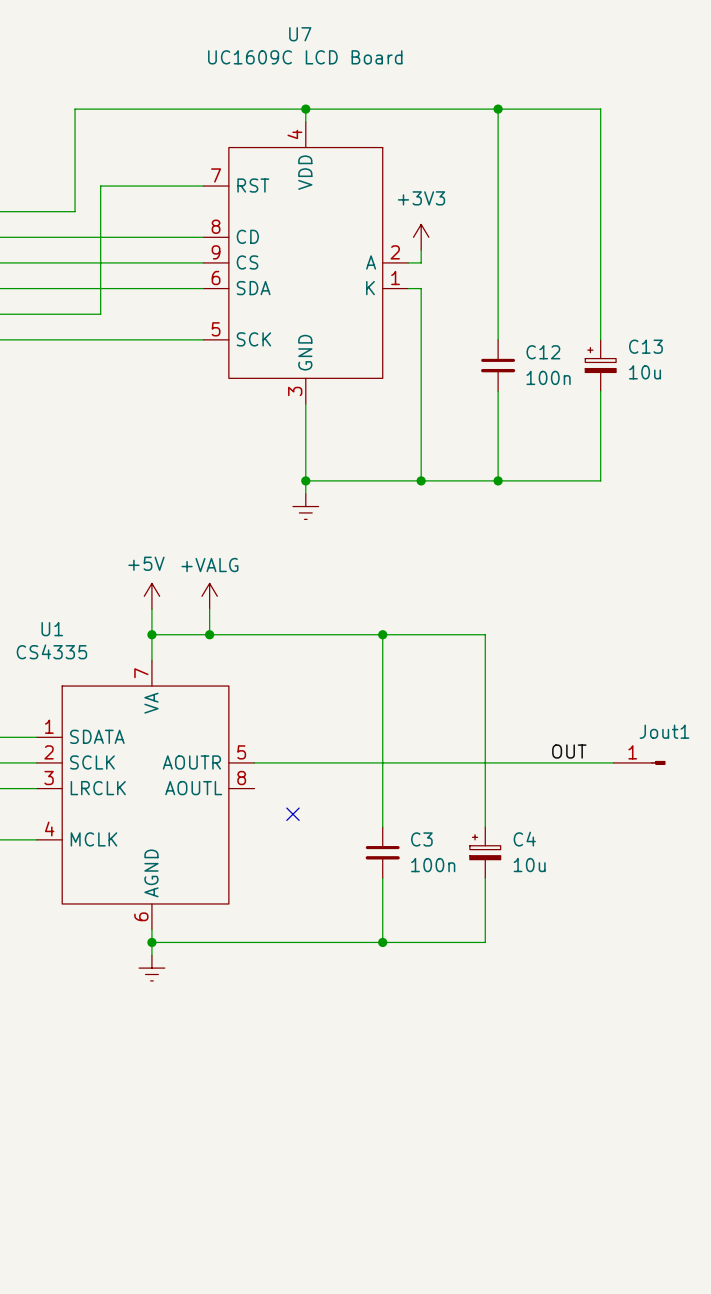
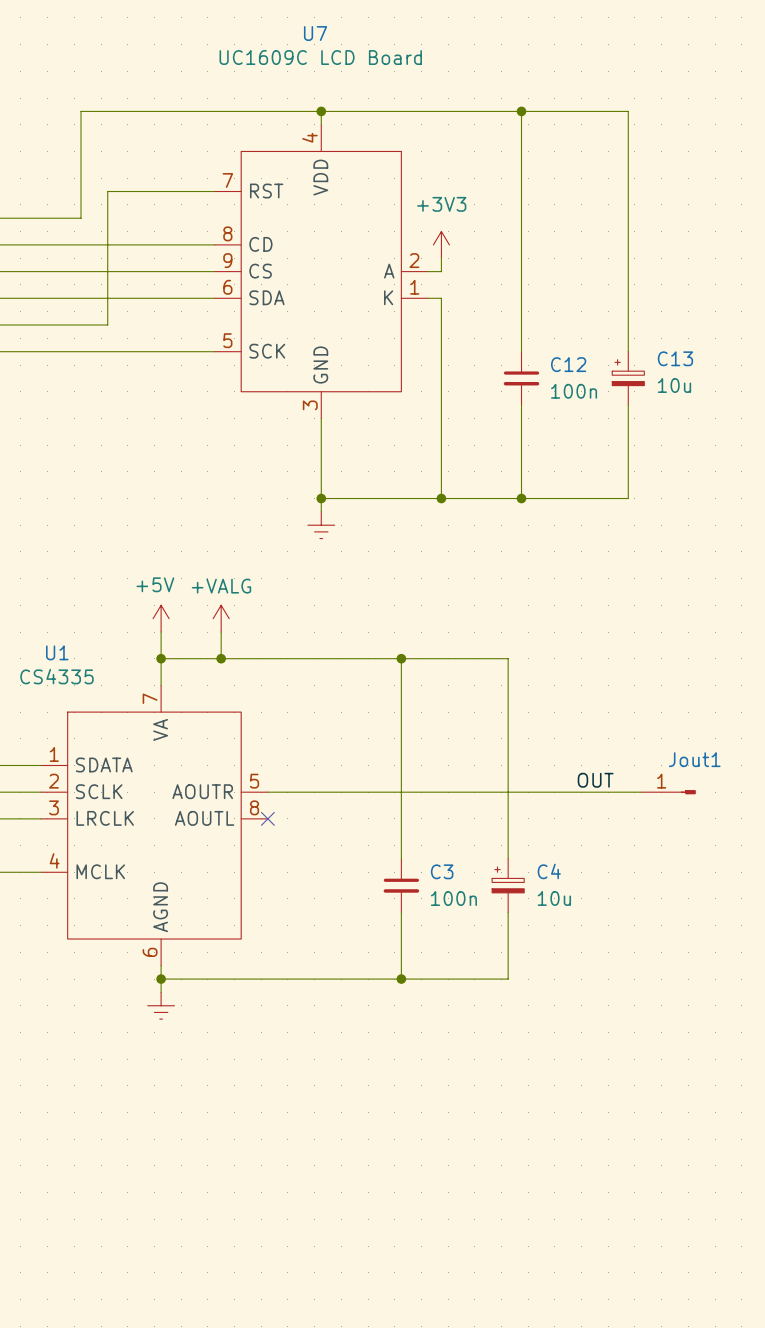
no-connect mark position: (292, 814) -> (267, 818)

